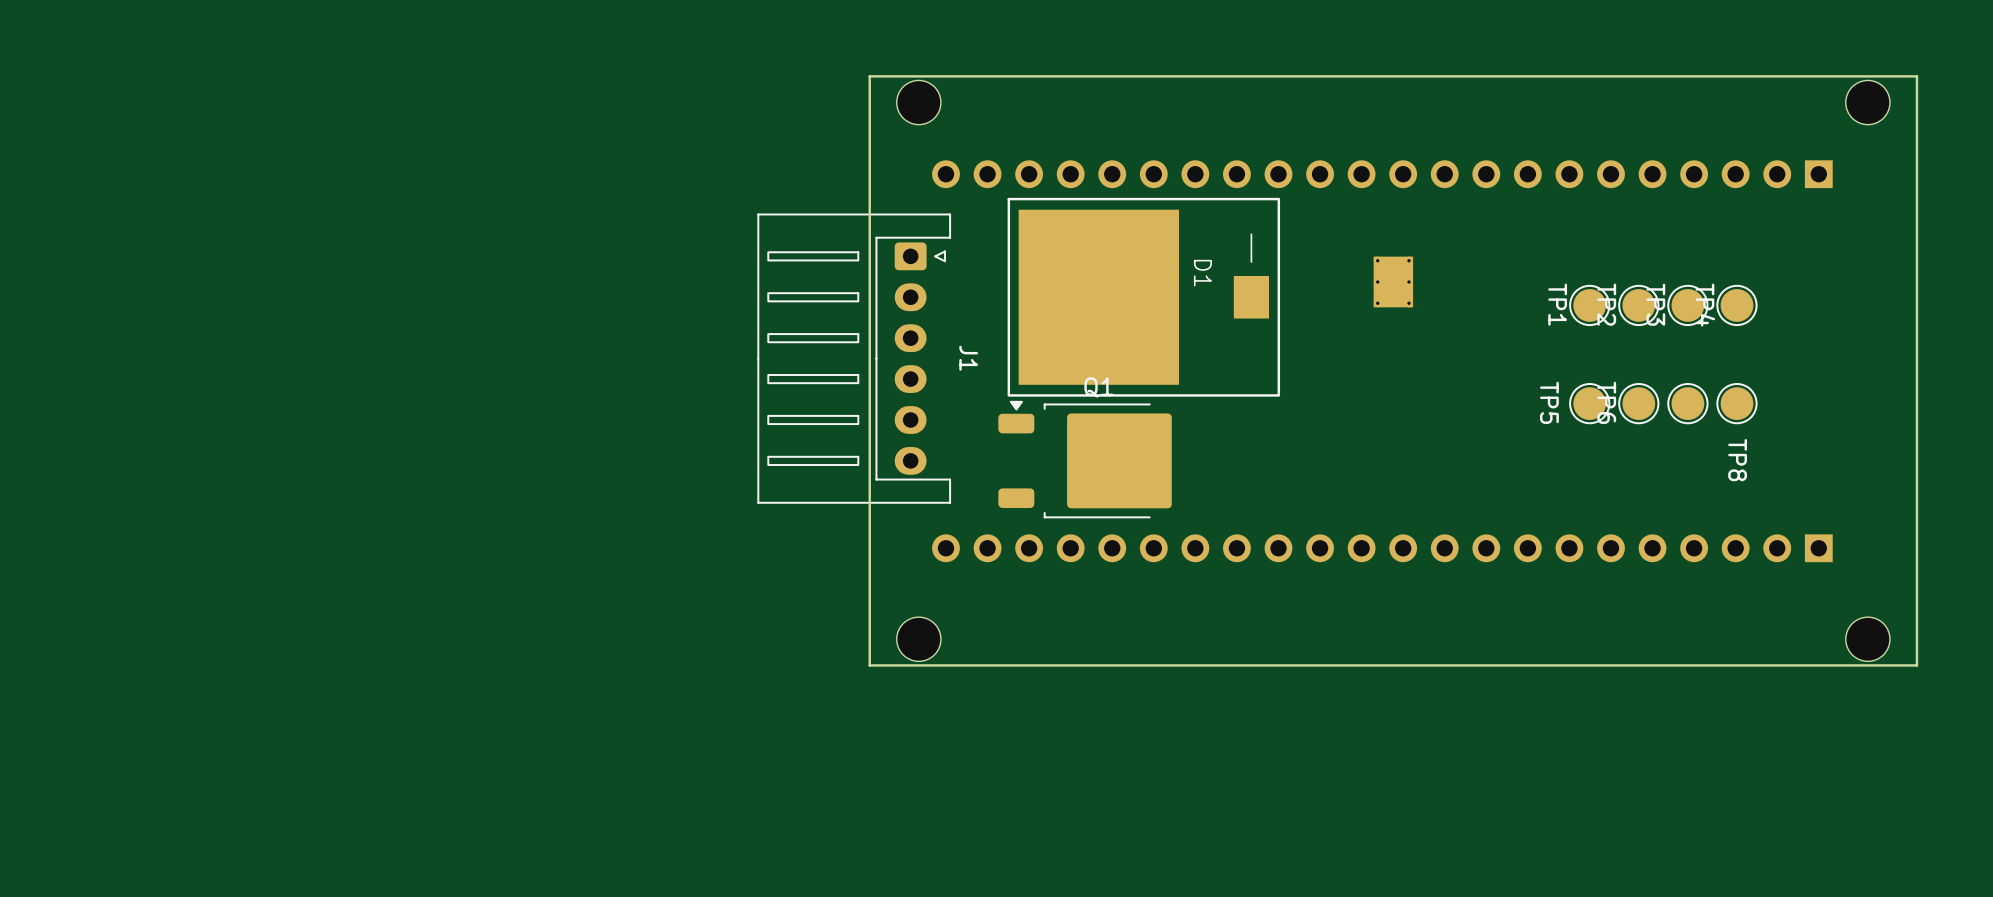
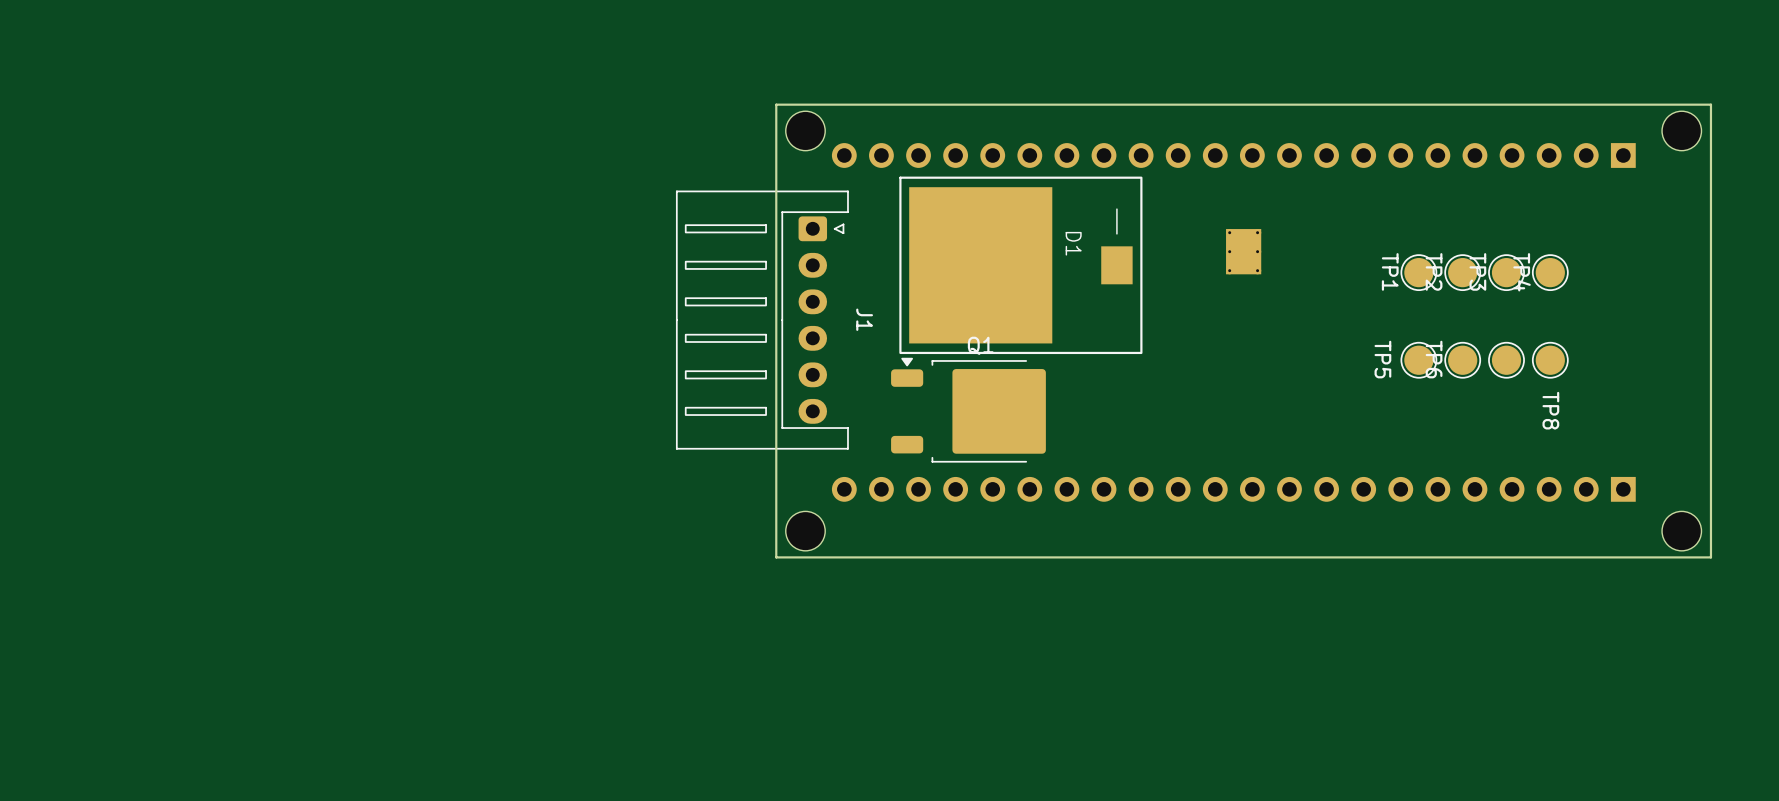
part position: (918, 102) -> (805, 130)
part position: (1867, 102) -> (1681, 130)
board edge: (1916, 117) (1916, 76) (869, 76) (869, 117) -> (1710, 104) (776, 104)
board edge: (1916, 624) (1916, 665) (869, 665) (869, 624) -> (1710, 557) (776, 557)
part position: (918, 639) -> (805, 531)
part position: (1867, 639) -> (1681, 531)

